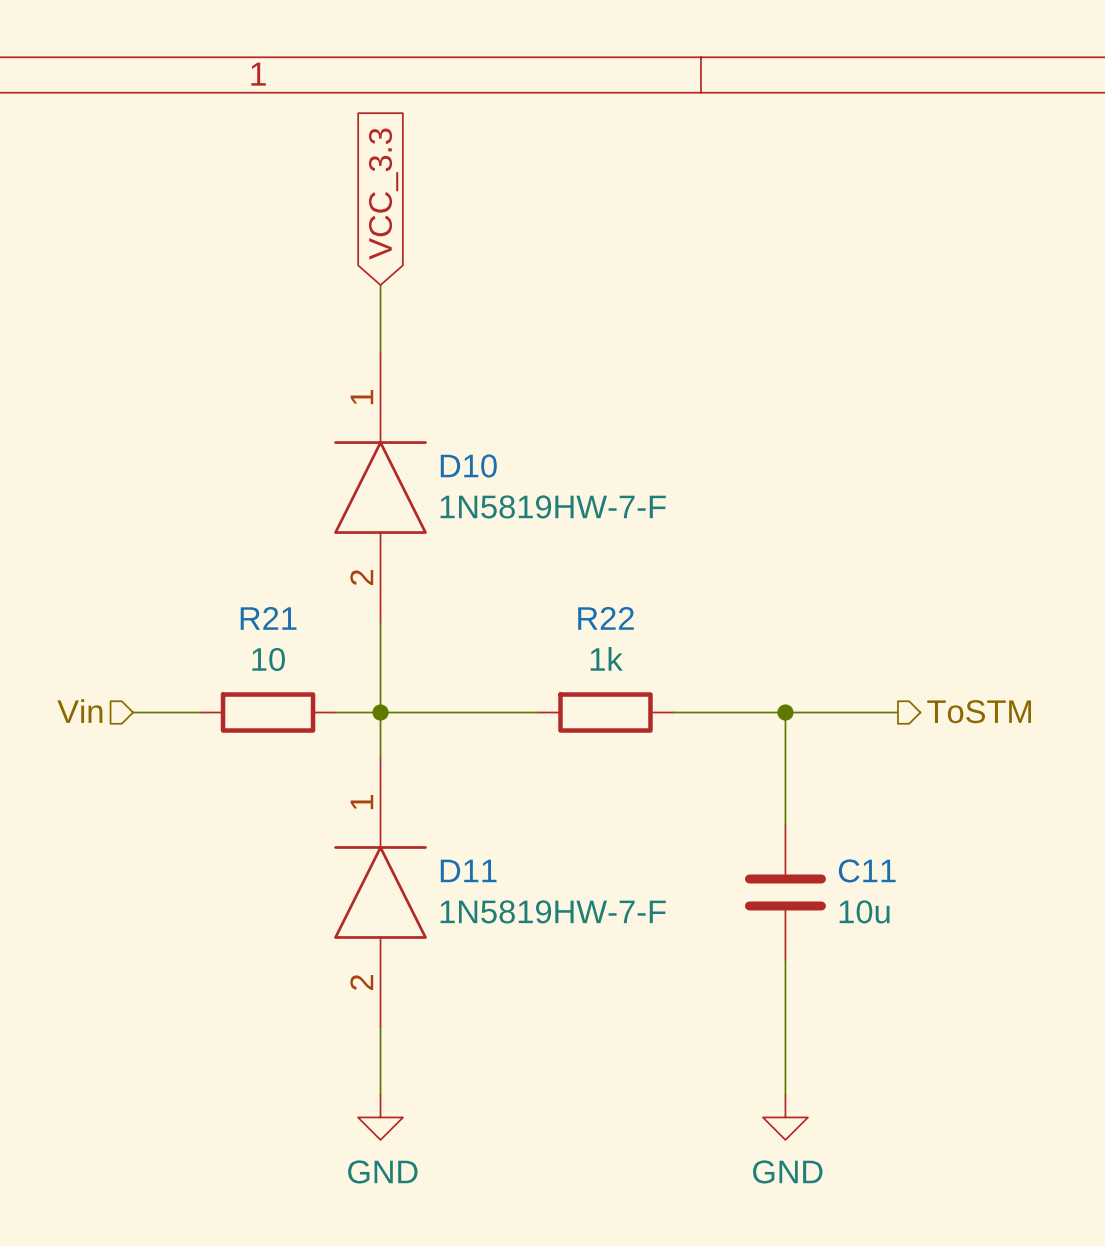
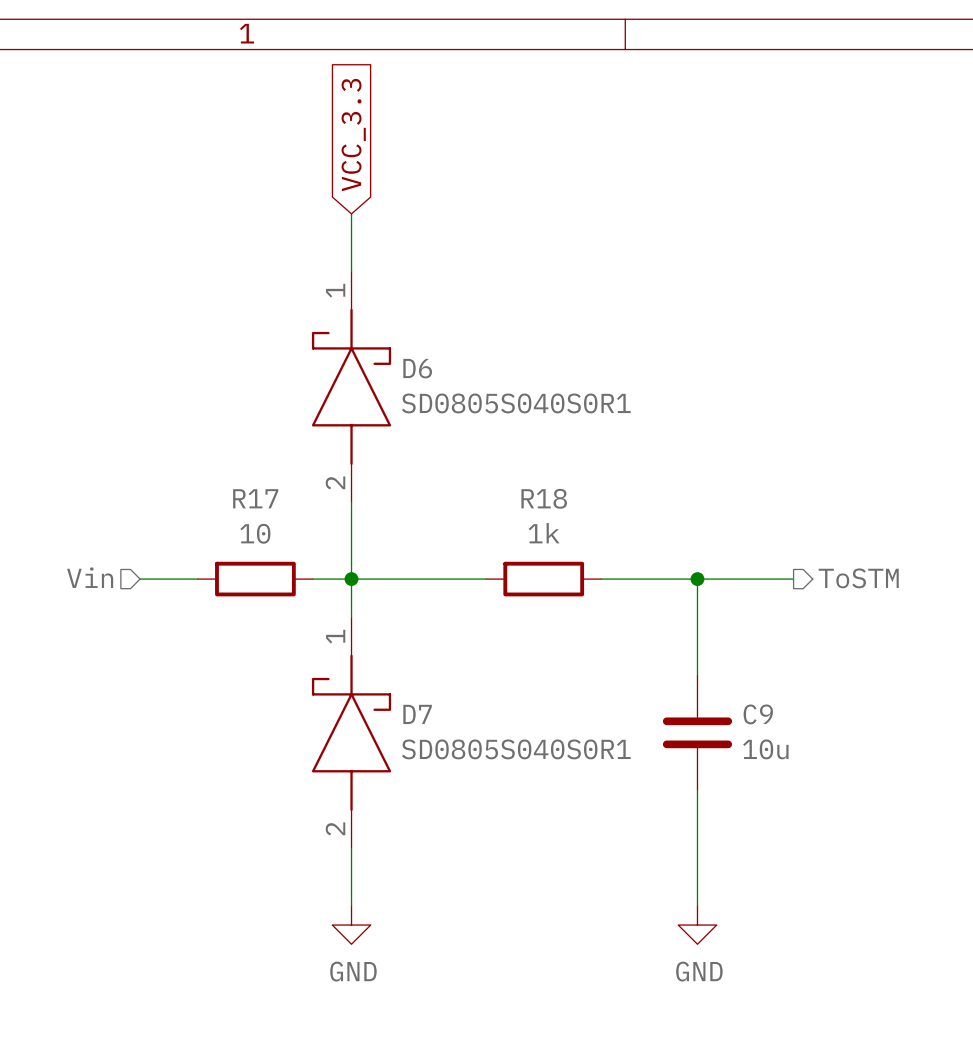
D10: 1N5819HW-7-F (380, 487) -> none
D6: none -> SD0805S040S0R1 (351, 386)
R21 name: R21 (268, 618) -> R17 (255, 498)
R22 name: R22 (606, 618) -> R18 (544, 498)
C11 name: C11 (867, 870) -> C9 (758, 714)
D11: 1N5819HW-7-F (380, 892) -> none
D7: none -> SD0805S040S0R1 (351, 732)

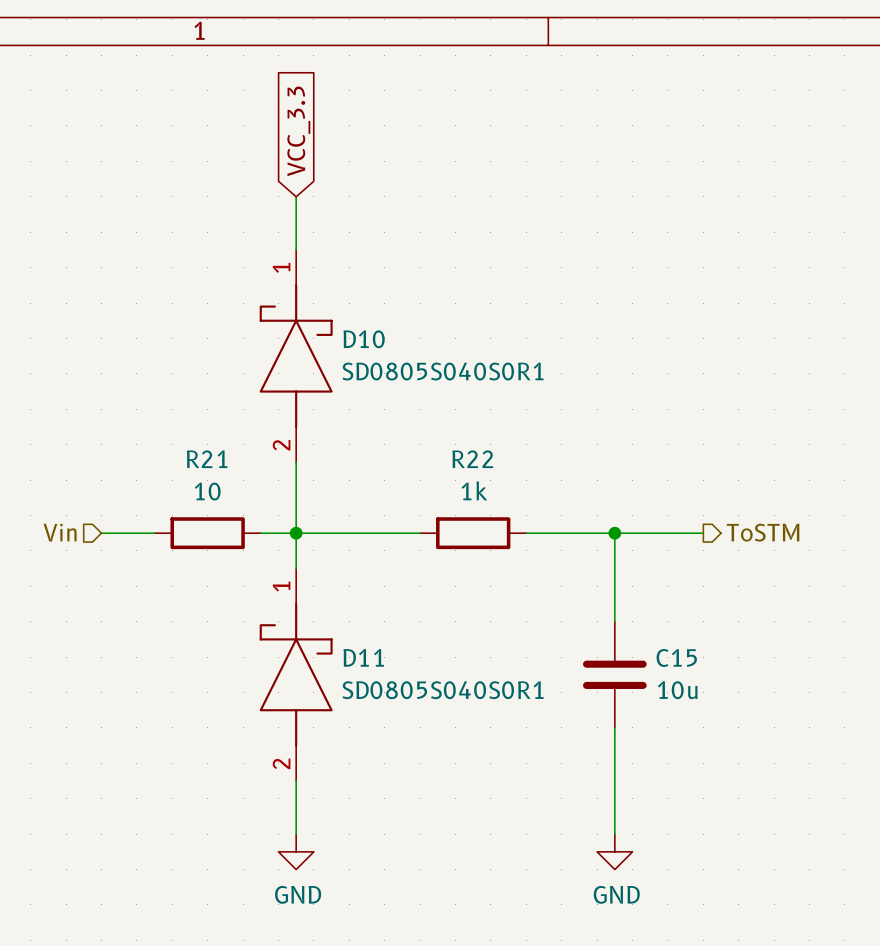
D6 name: D6 (417, 368) -> D10 (364, 339)
R17 name: R17 (255, 498) -> R21 (207, 459)
R18 name: R18 (544, 498) -> R22 (472, 459)
D7 name: D7 (417, 714) -> D11 (363, 657)
C9 name: C9 (758, 714) -> C15 (676, 657)

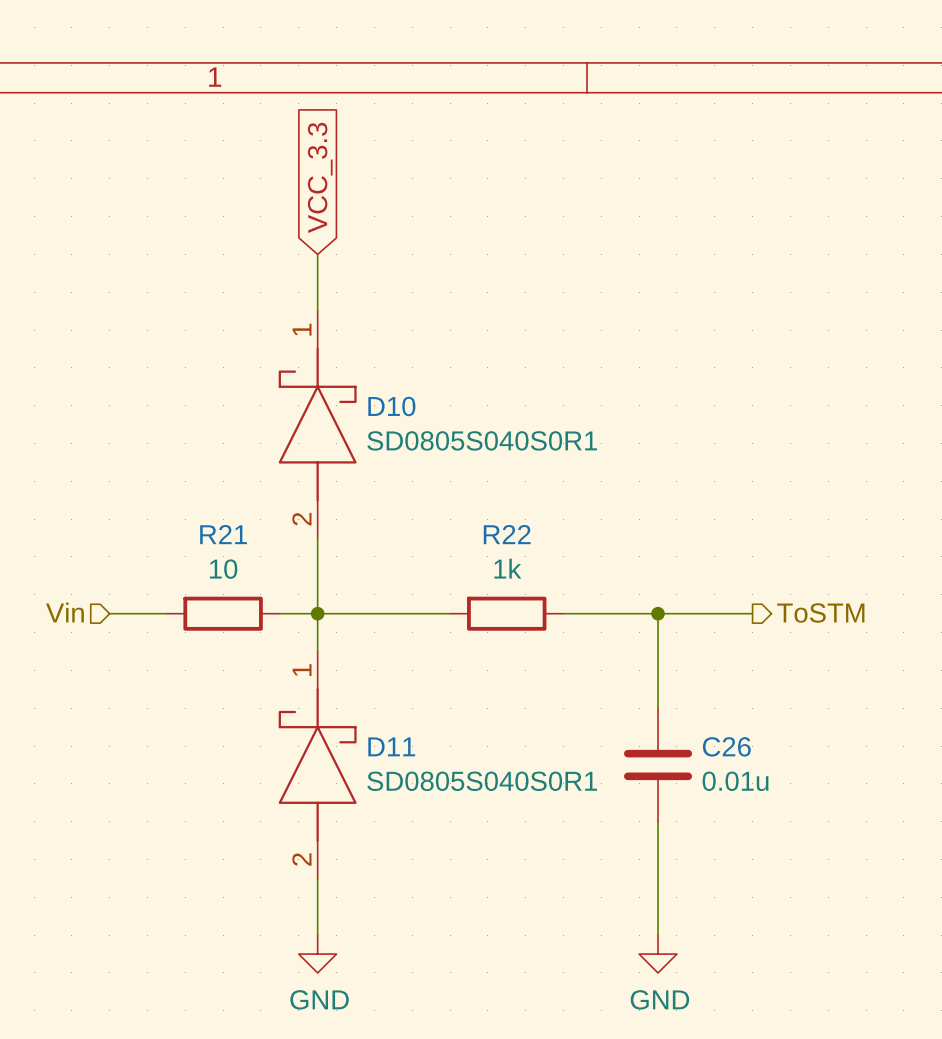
C15 name: C15 (676, 657) -> C26 (726, 746)
C15 value: 10u (677, 690) -> 0.01u (735, 781)

